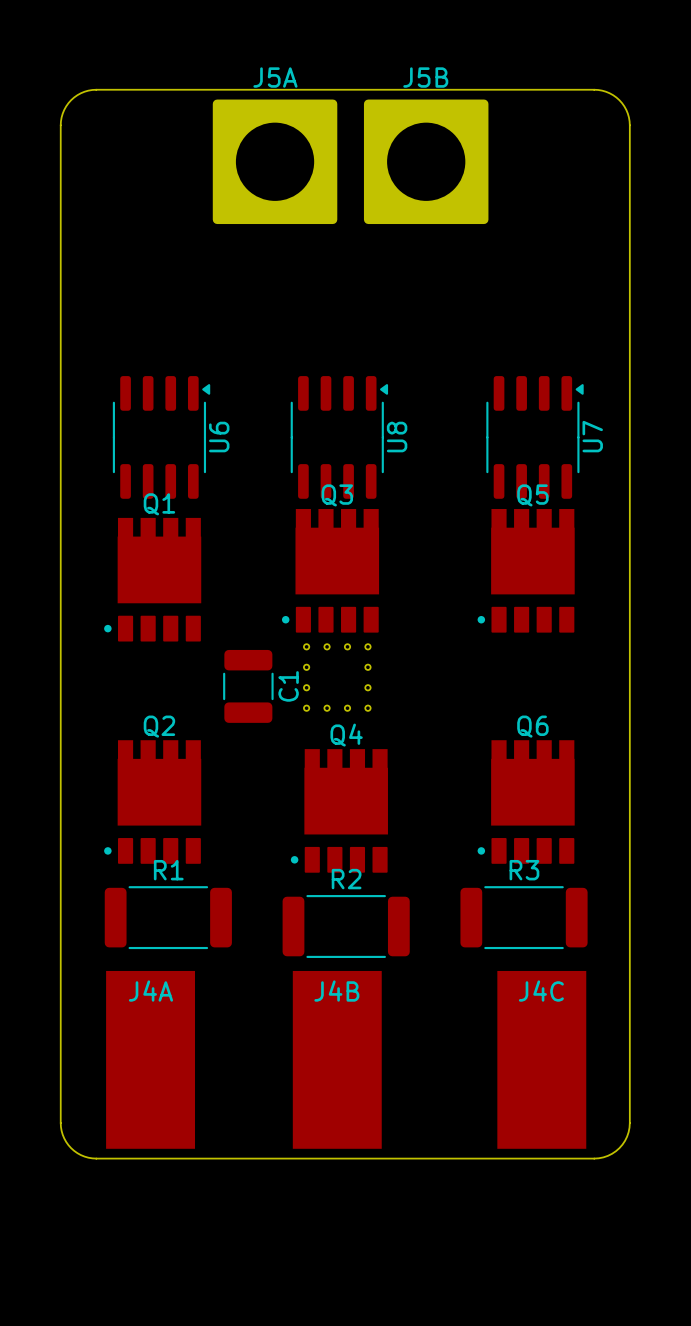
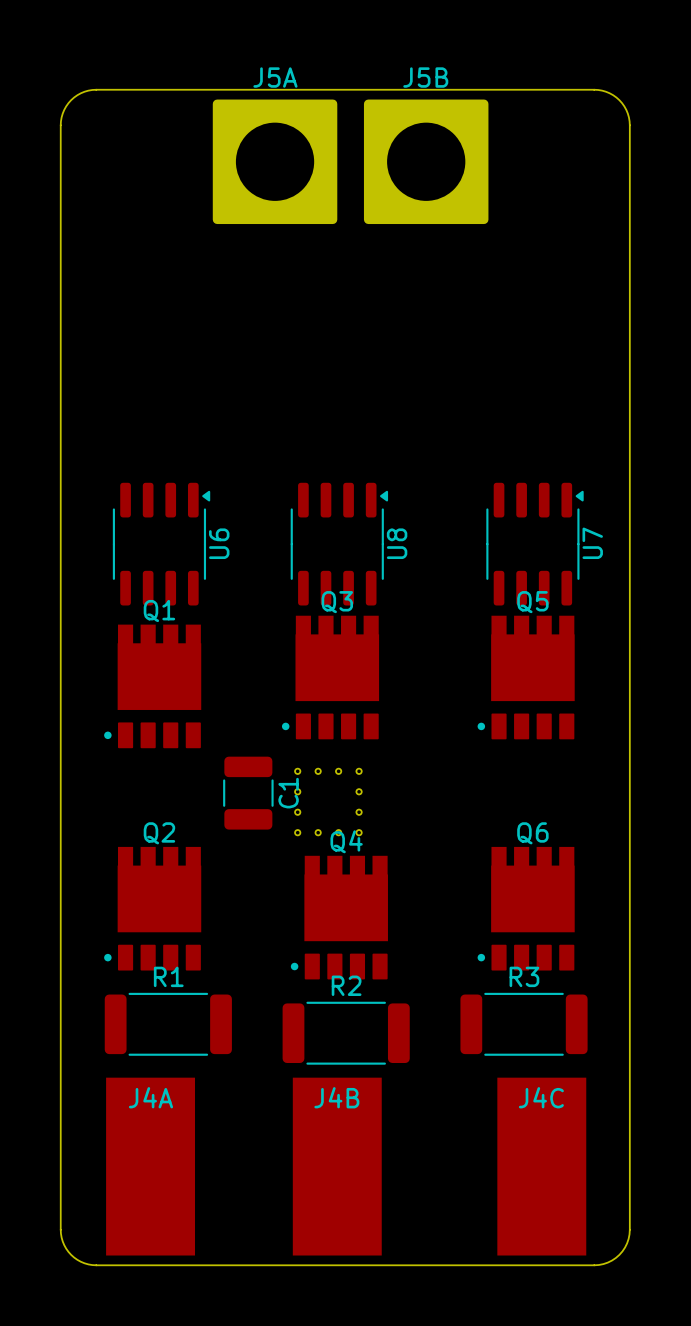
U6 position: (161, 437) -> (161, 544)
U8 position: (339, 437) -> (339, 544)
U7 position: (535, 437) -> (535, 544)
Q3 position: (330, 570) -> (330, 677)
Q5 position: (526, 570) -> (526, 677)
Q1 position: (152, 579) -> (152, 686)
part position: (337, 677) -> (328, 802)
C1 position: (248, 686) -> (248, 793)
Q2 position: (152, 802) -> (152, 908)
Q6 position: (526, 802) -> (526, 908)
Q4 position: (339, 810) -> (339, 917)
R1 position: (168, 917) -> (168, 1024)
R3 position: (524, 917) -> (524, 1024)
R2 position: (346, 926) -> (346, 1033)
J4A position: (150, 1059) -> (150, 1166)
J4B position: (337, 1059) -> (337, 1166)
J4C position: (541, 1059) -> (541, 1166)
board edge: (60, 1123) (62, 1134) (71, 1148) (80, 1155) (96, 1158) (598, 1158) (612, 1153) (622, 1144) (628, 1132) (629, 1123) -> (60, 1123) (61, 1237) (66, 1248) (74, 1257) (84, 1263) (96, 1265) (603, 1264) (619, 1254) (625, 1247) (629, 1234) (629, 1123)

